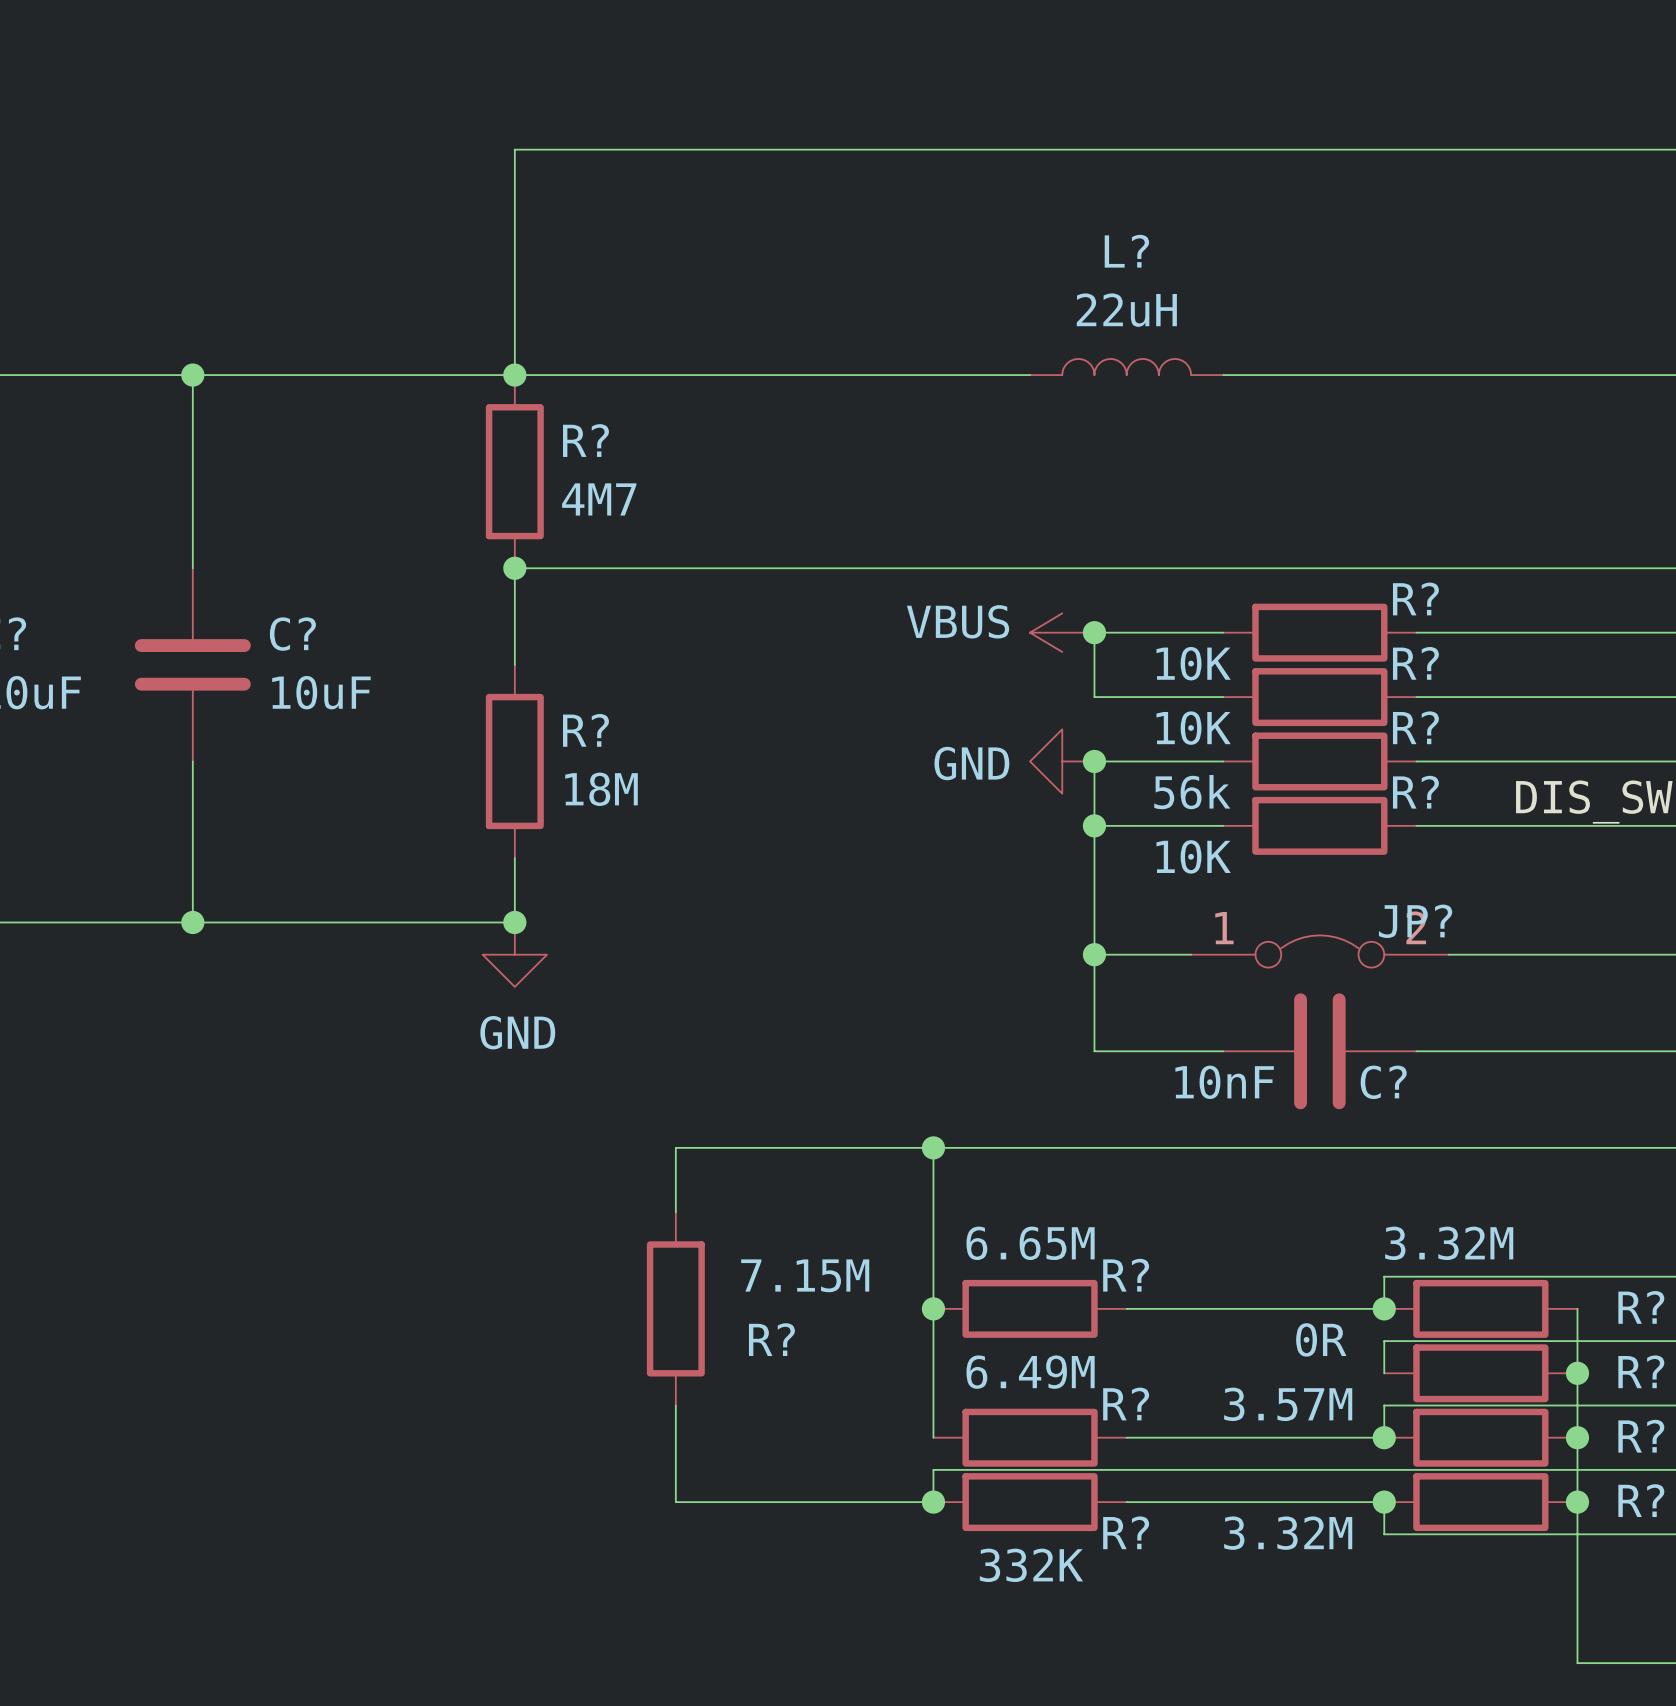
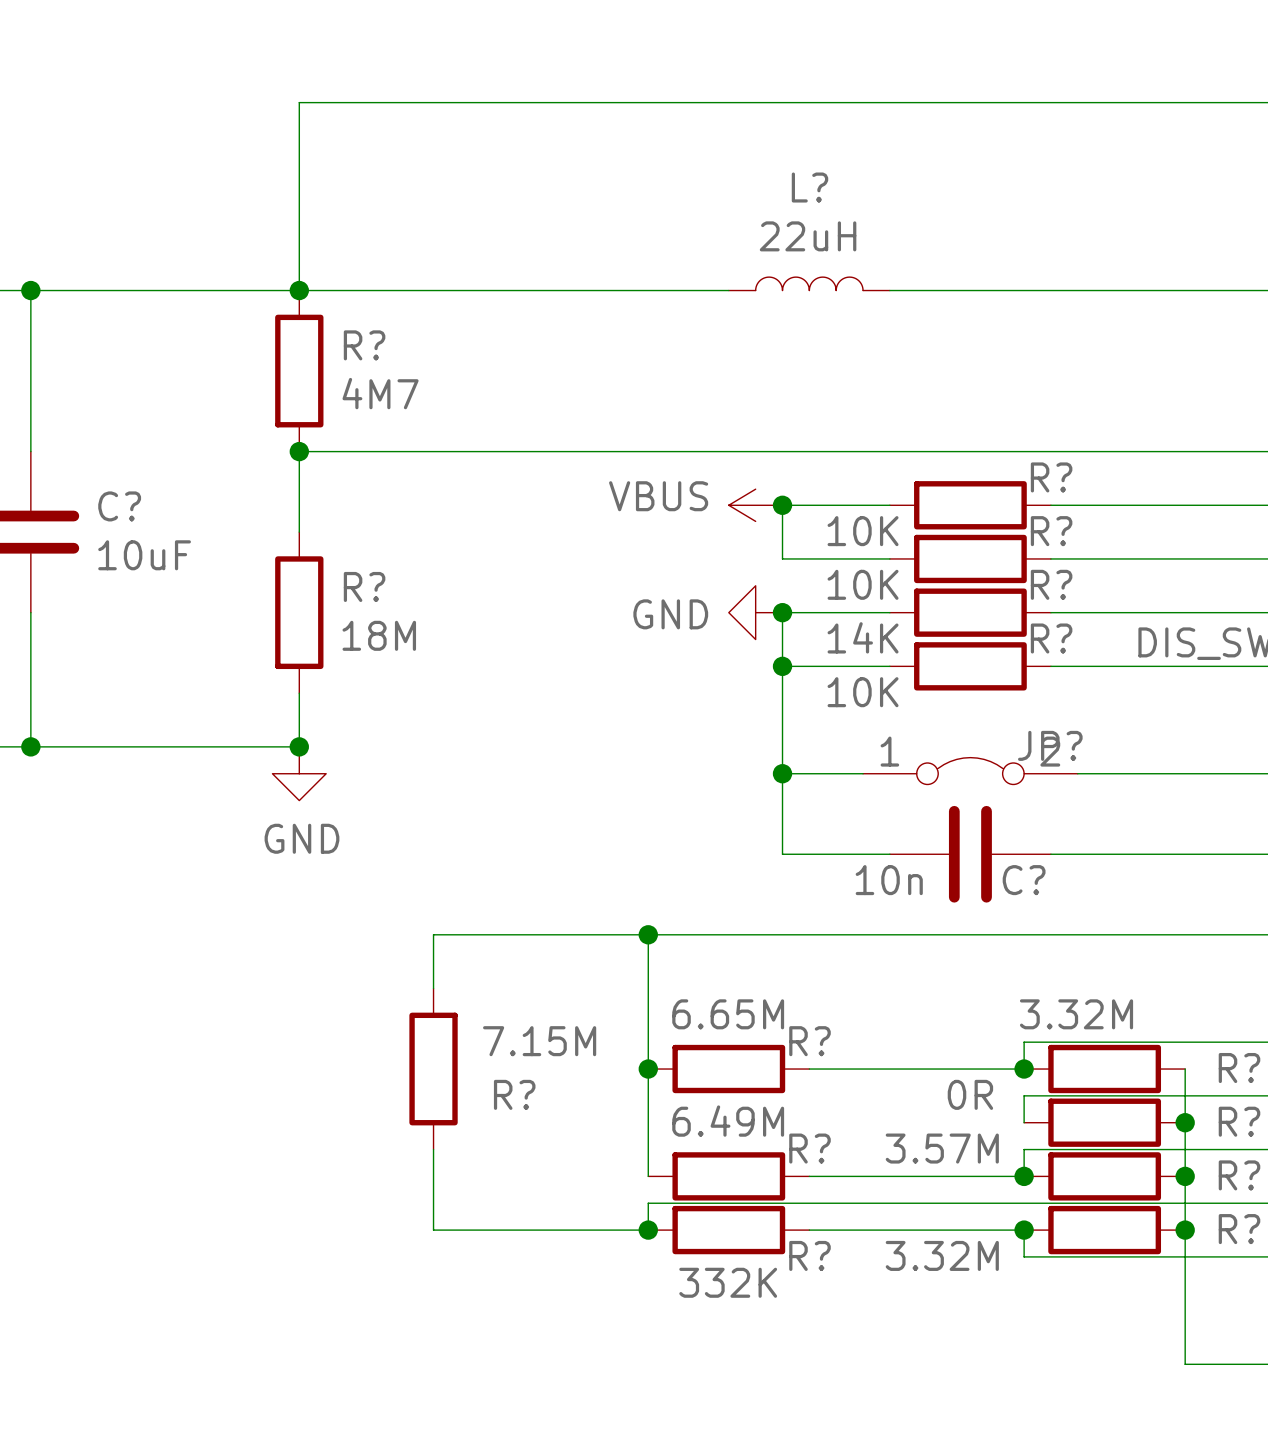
R? value: 56k (1192, 792) -> 14K (863, 637)
C? value: 10nF (1224, 1082) -> 10n (889, 880)

